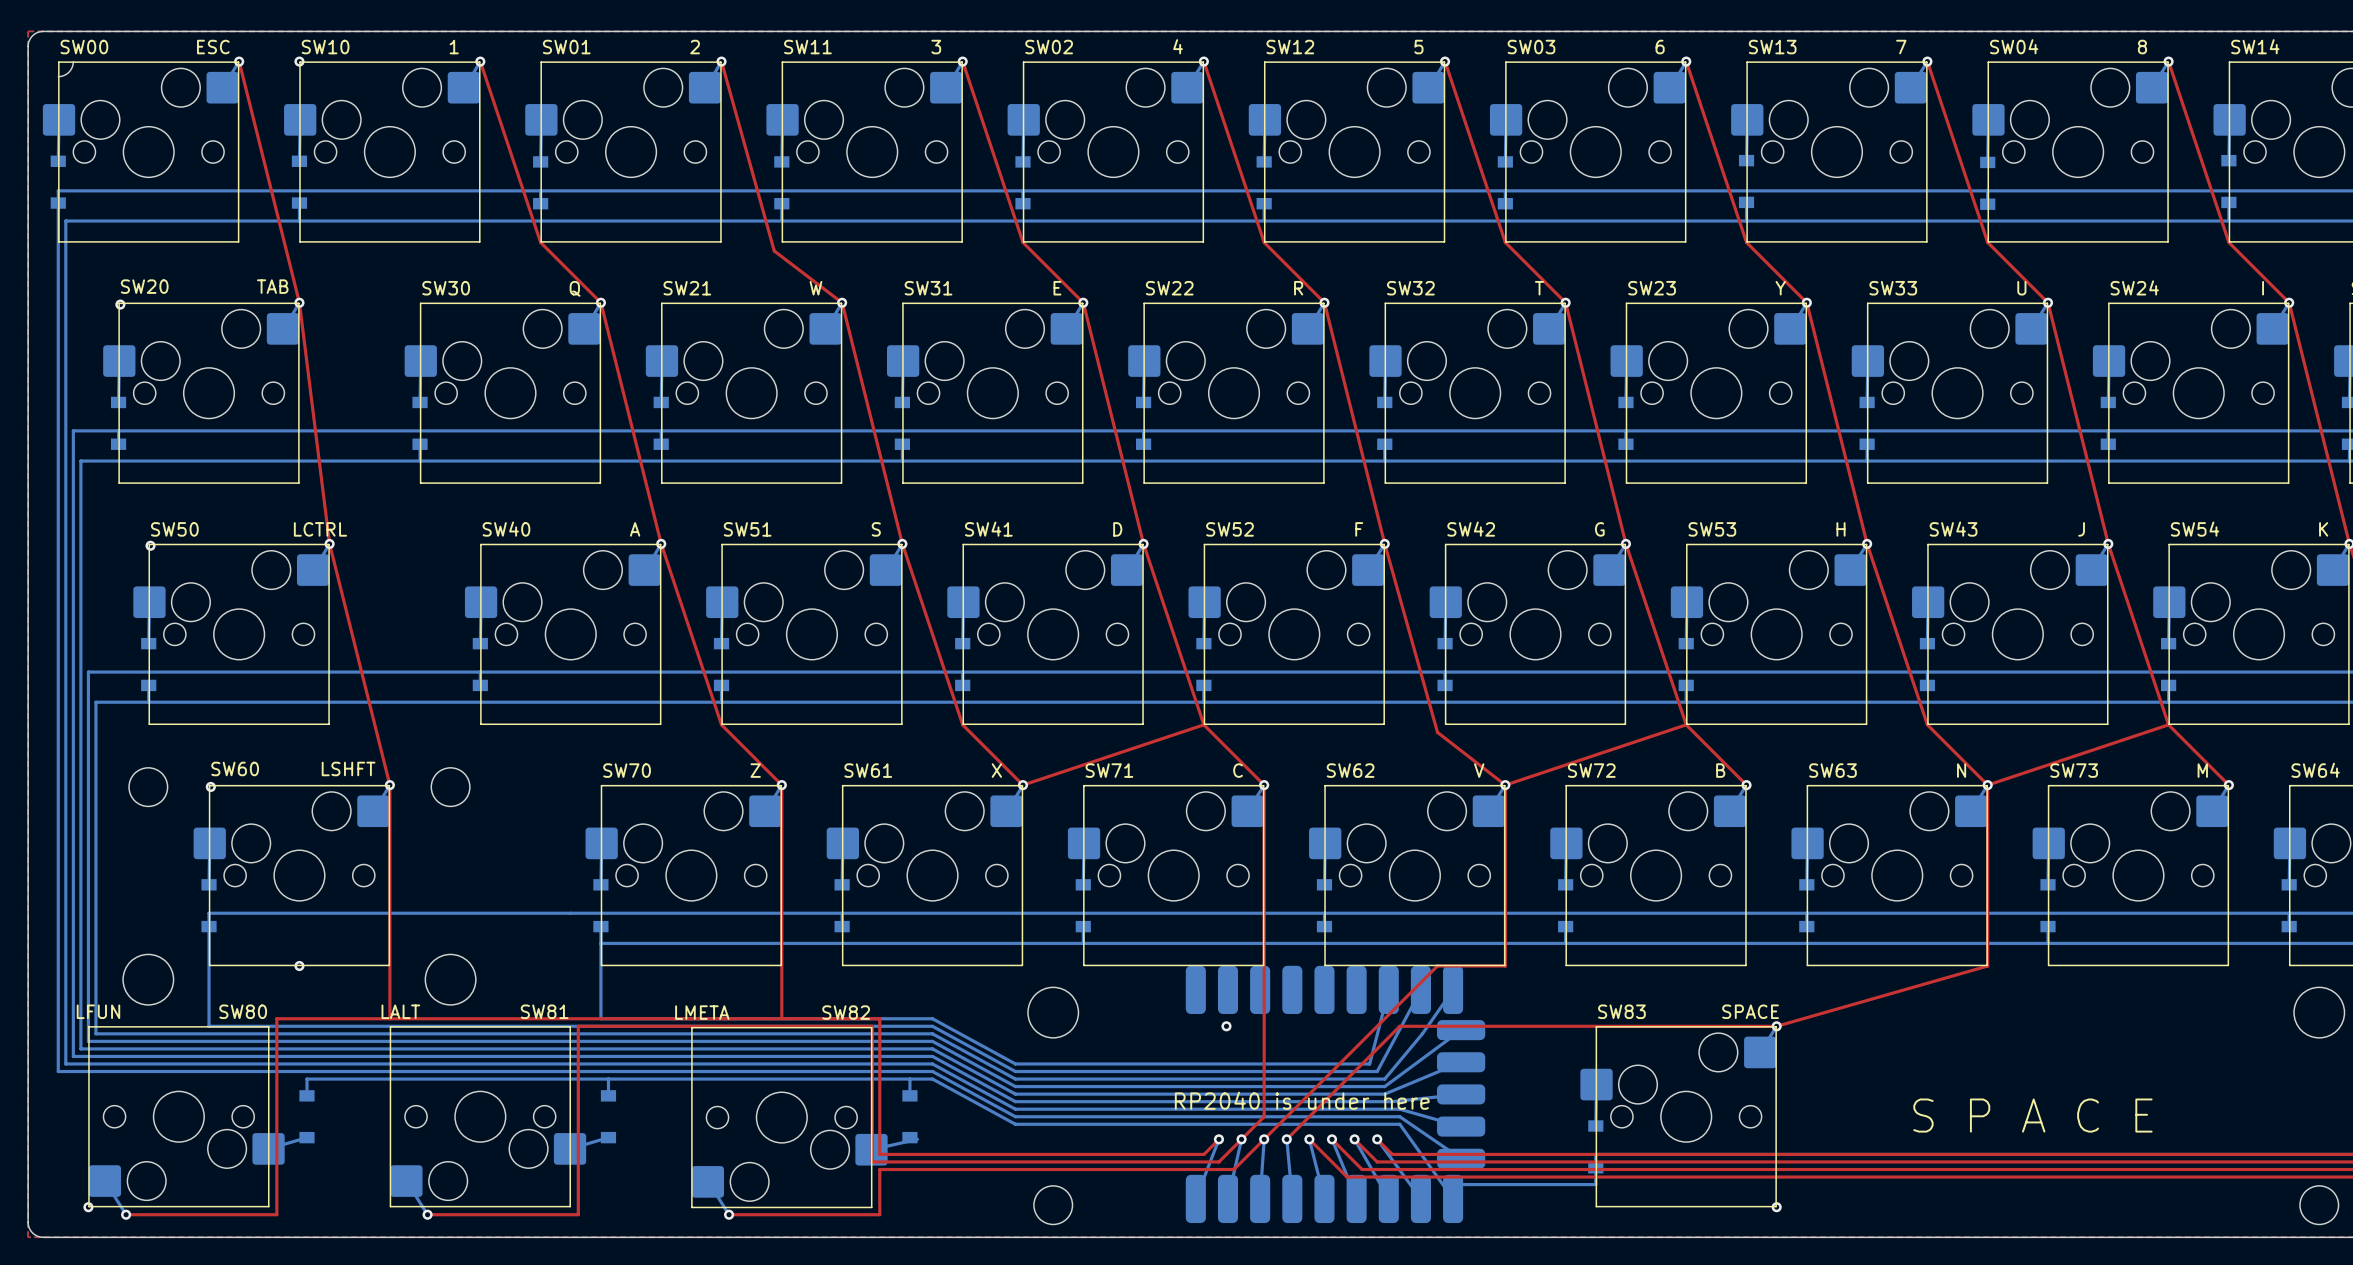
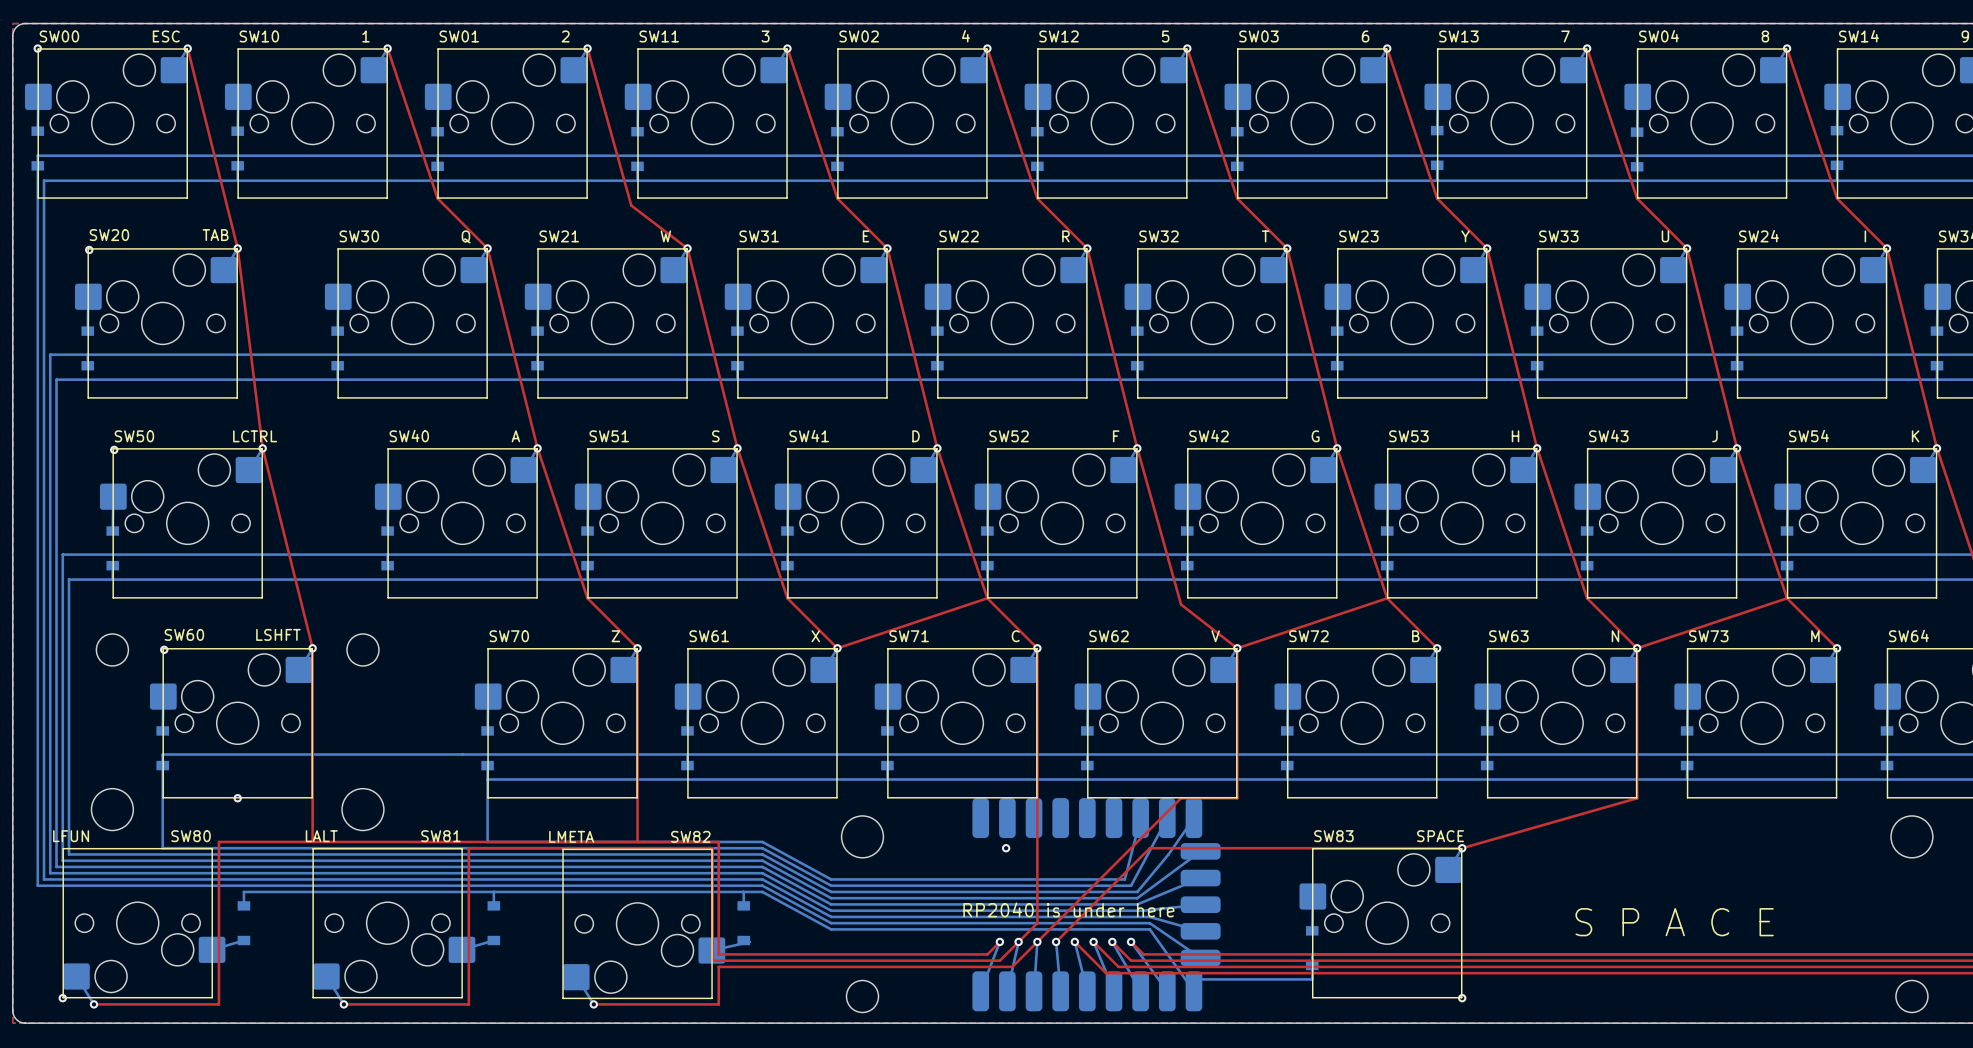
via: none -> (37, 48)
board edge: (73, 61) (68, 72) (58, 76) -> none
via: (299, 61) -> none

